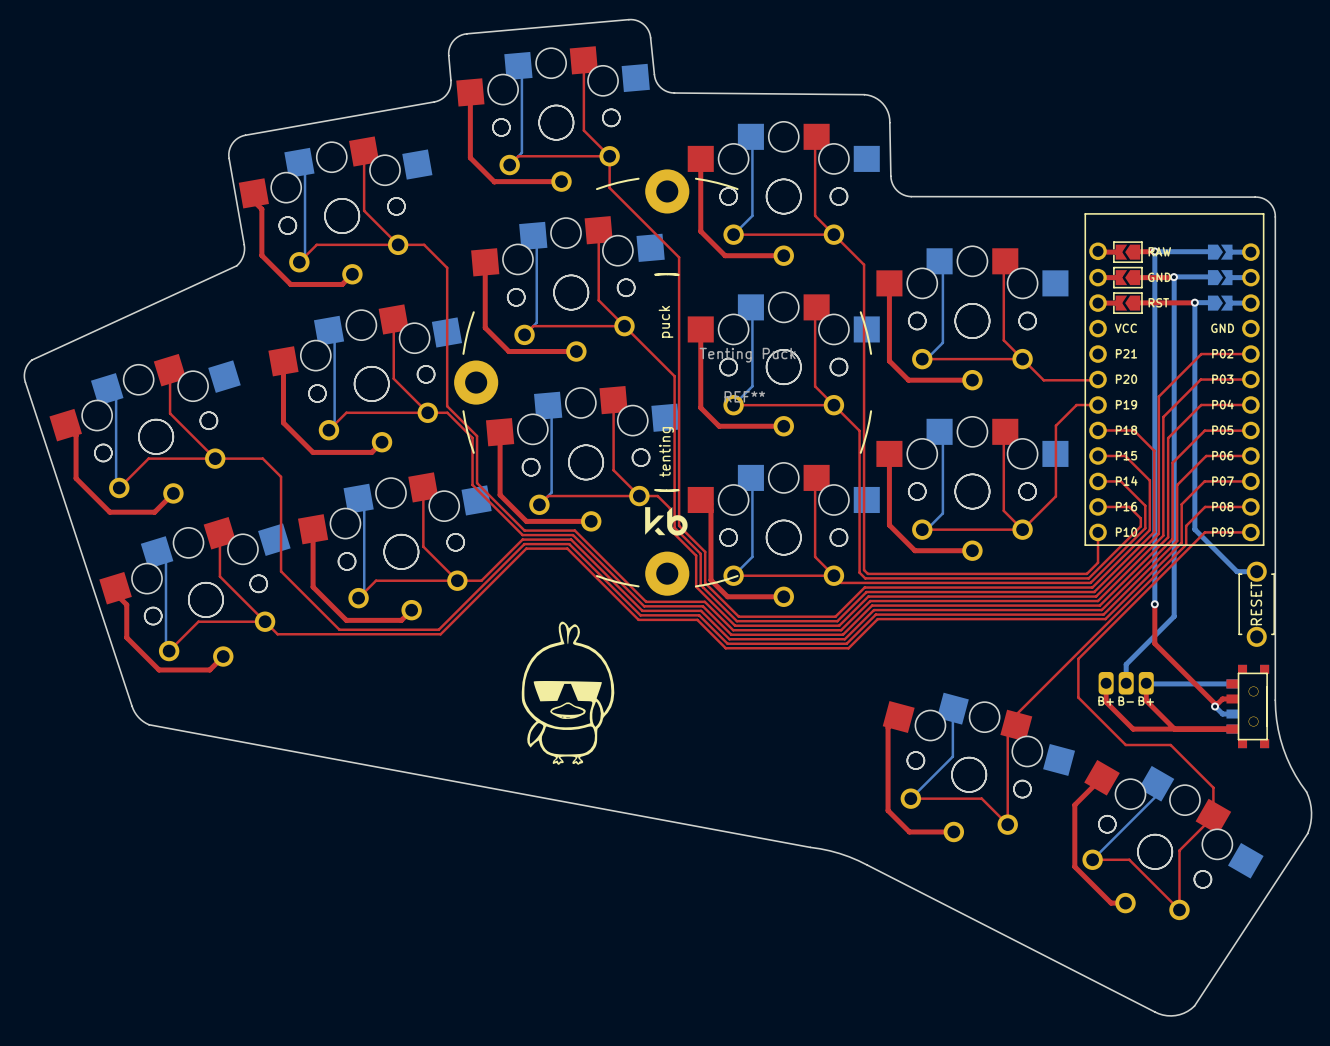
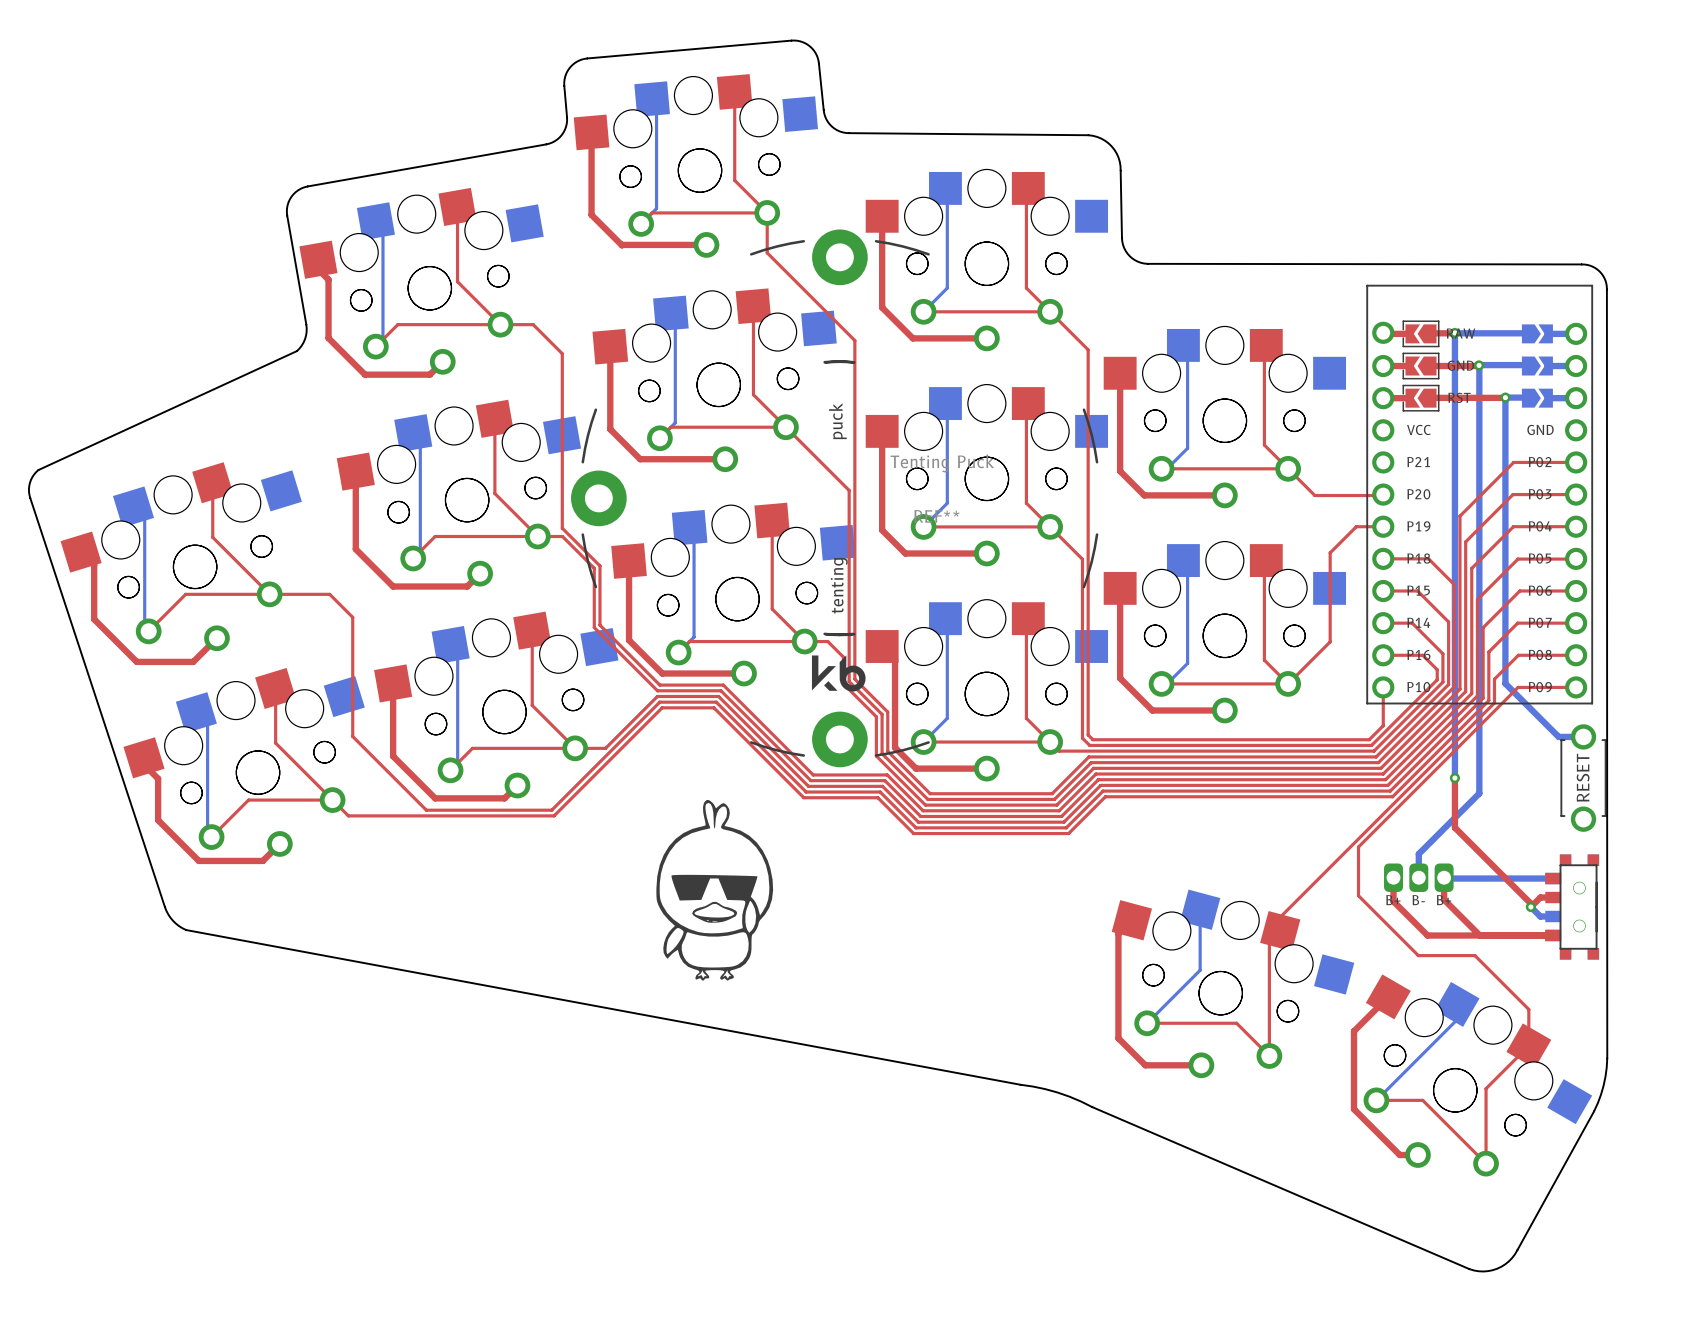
board edge: (1275, 216) (1275, 709) (1283, 748) (1310, 802) (1311, 818) (1307, 833) (1194, 1006) (1183, 1013) (1171, 1015) (1154, 1011) (867, 865) -> (1606, 289) (1606, 1067) (1601, 1094) (1594, 1111) (1515, 1254) (1505, 1264) (1492, 1270) (1478, 1271) (1469, 1269) (1092, 1107)

